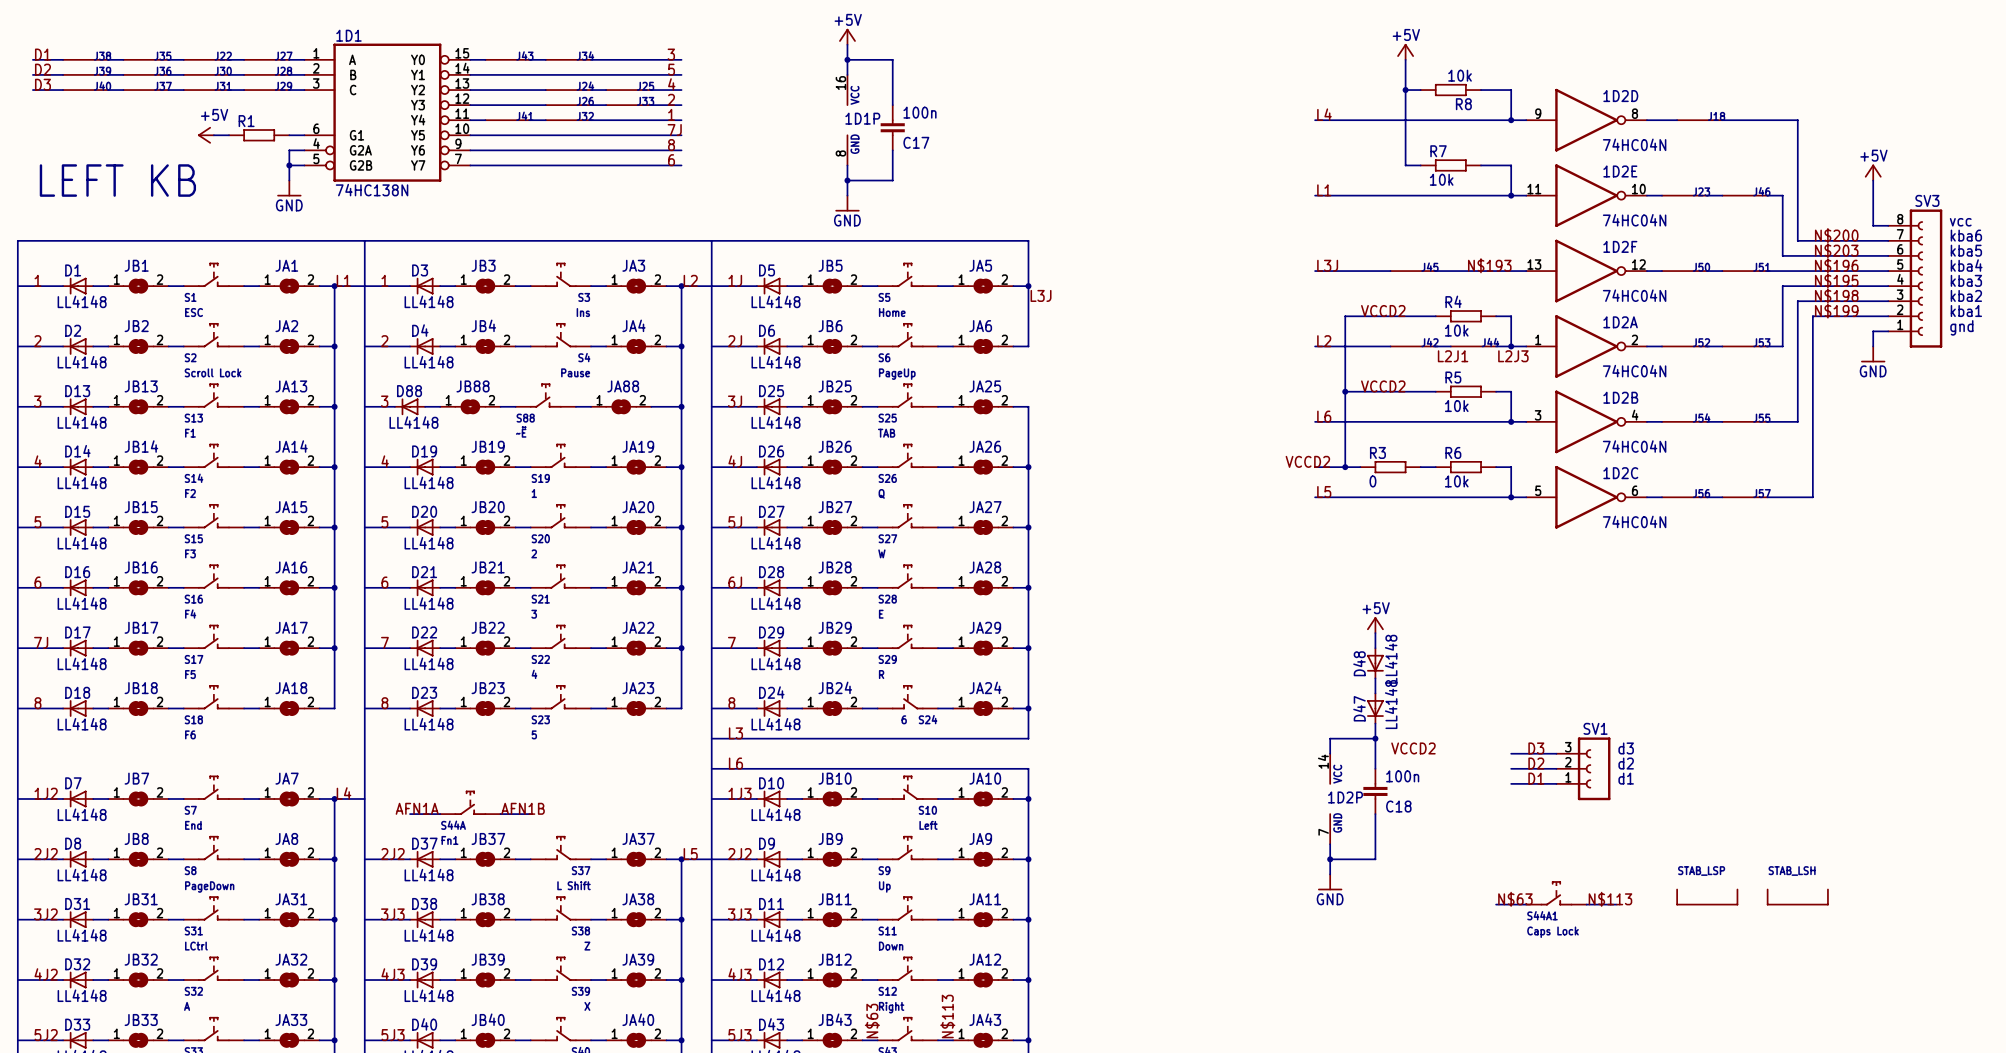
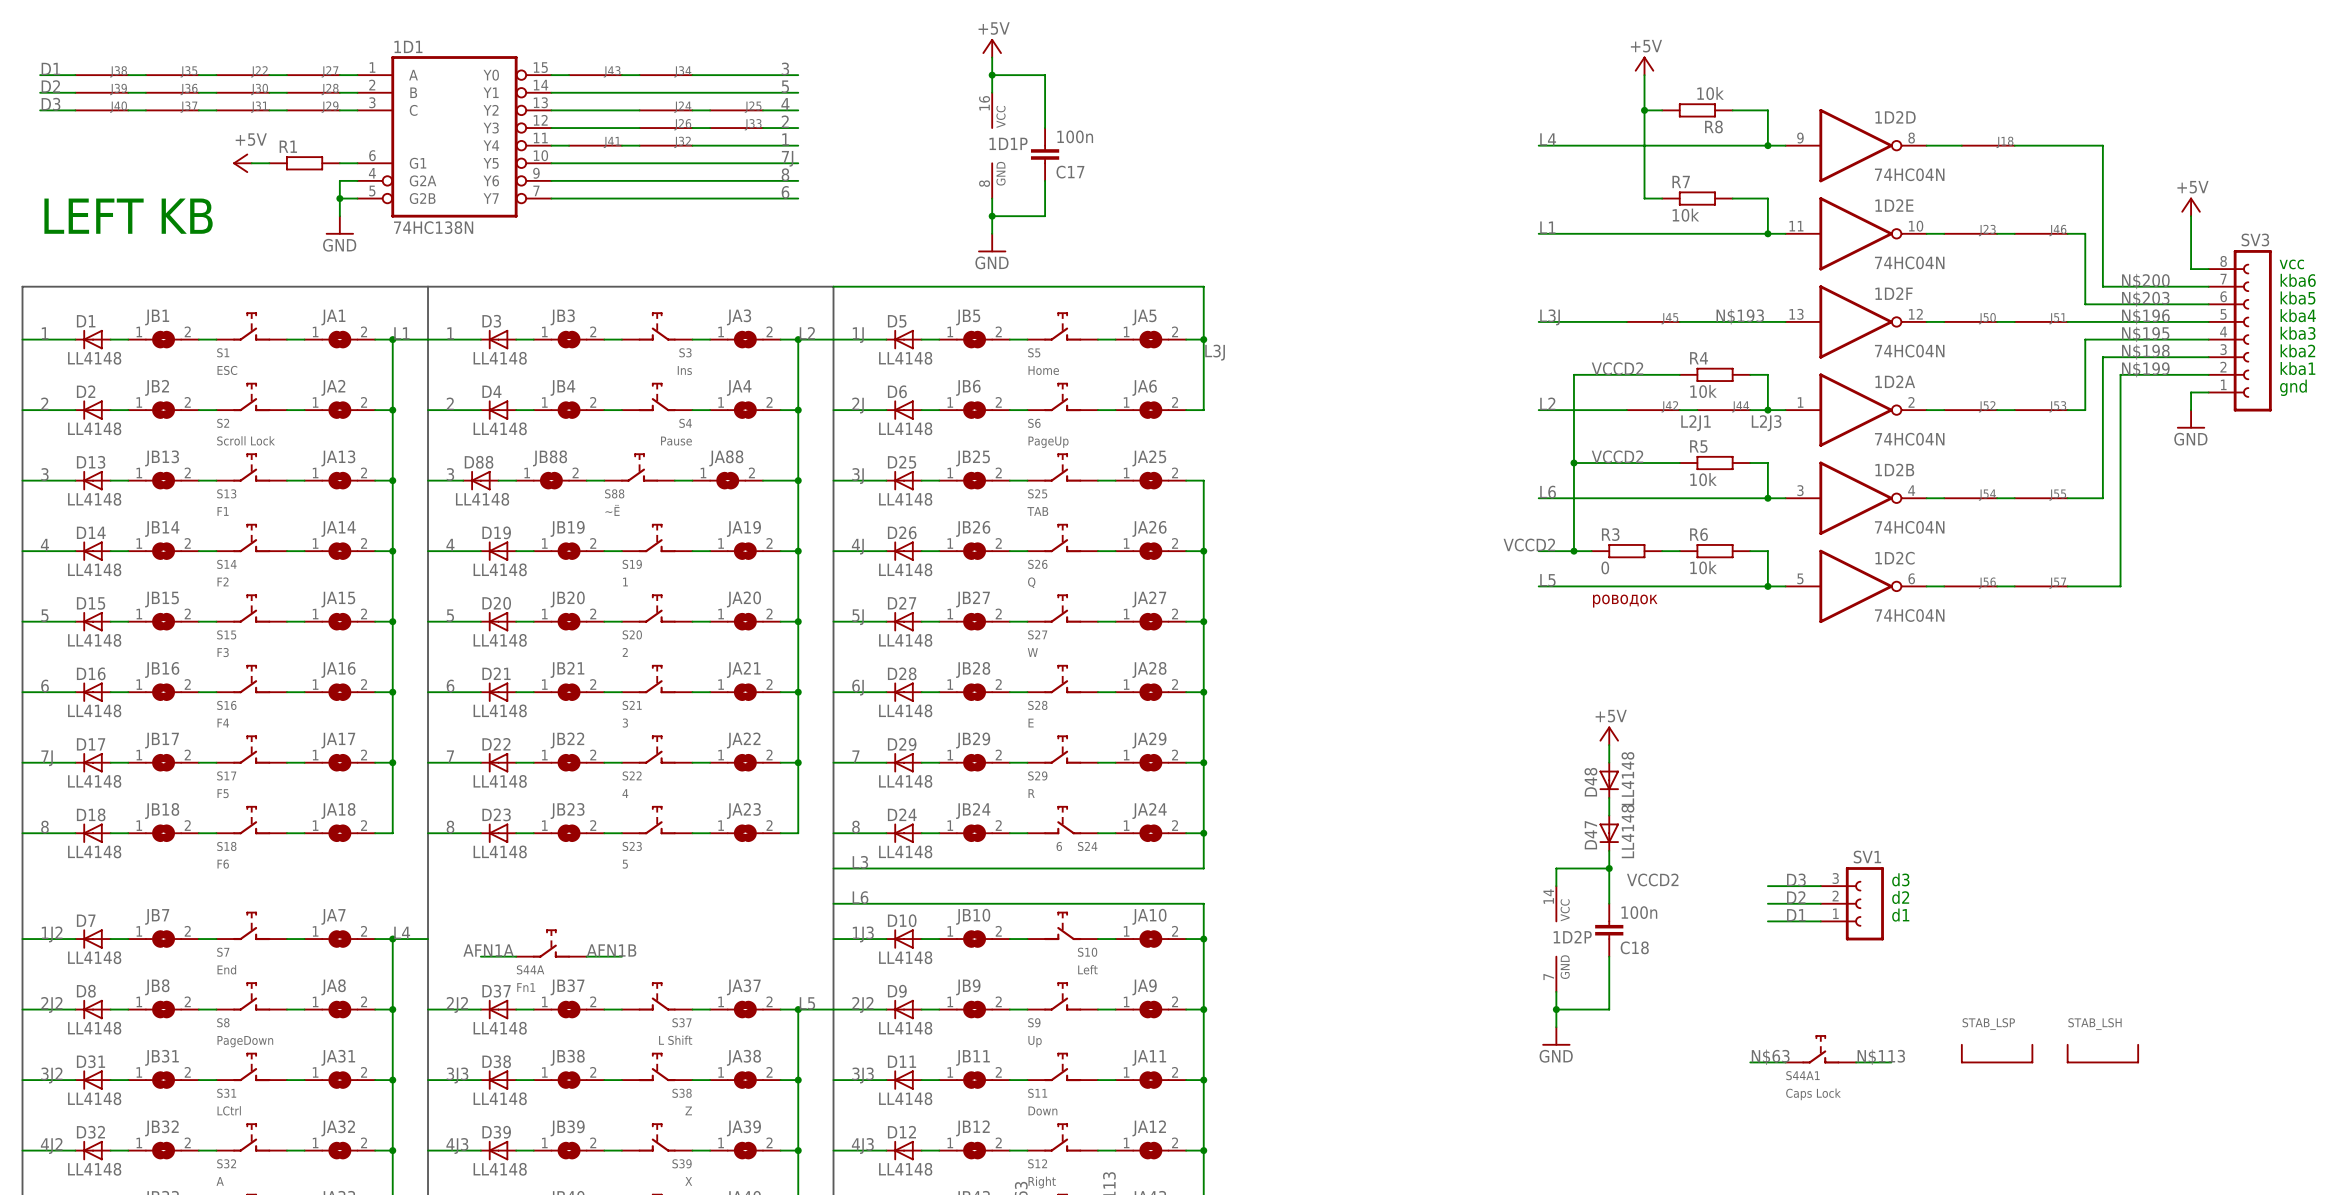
text: none -> роводок (1625, 601)

